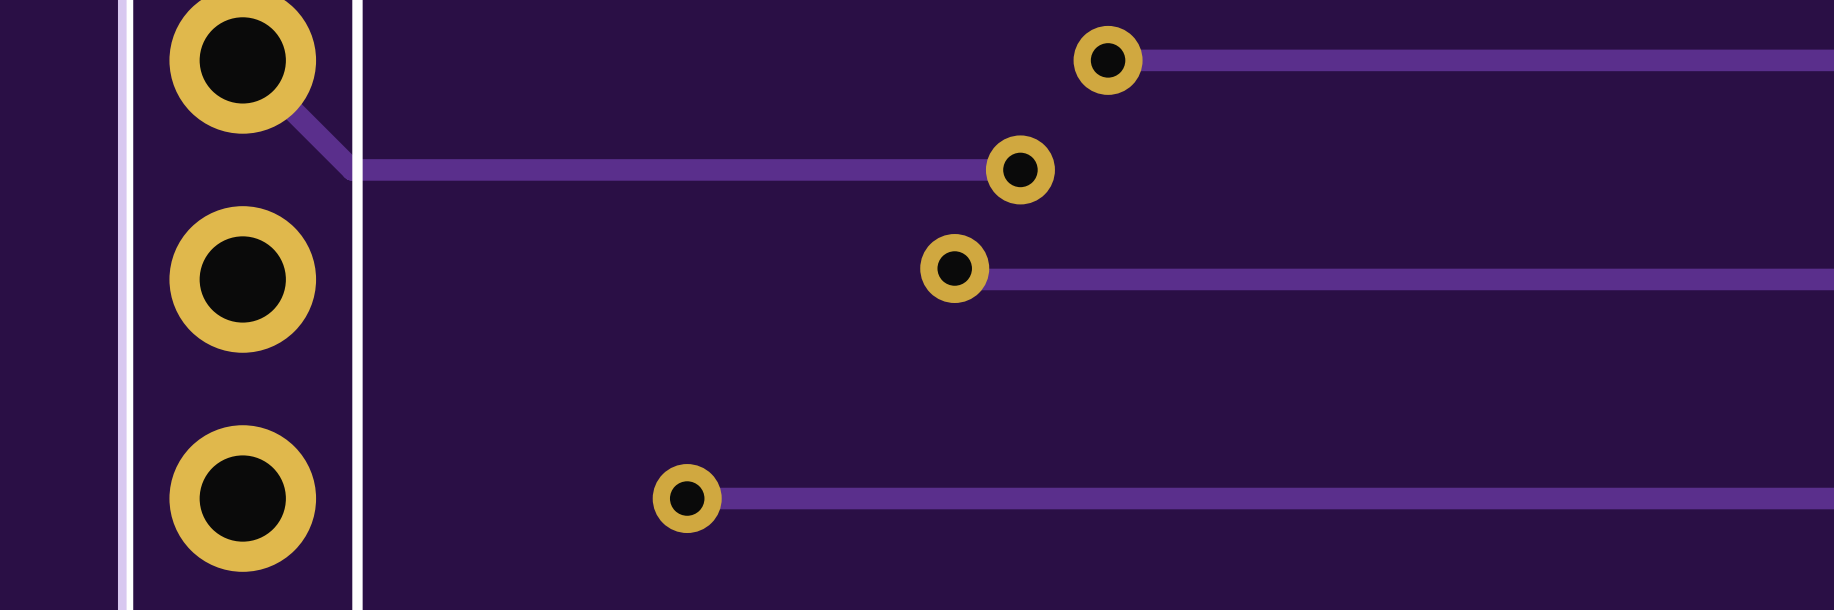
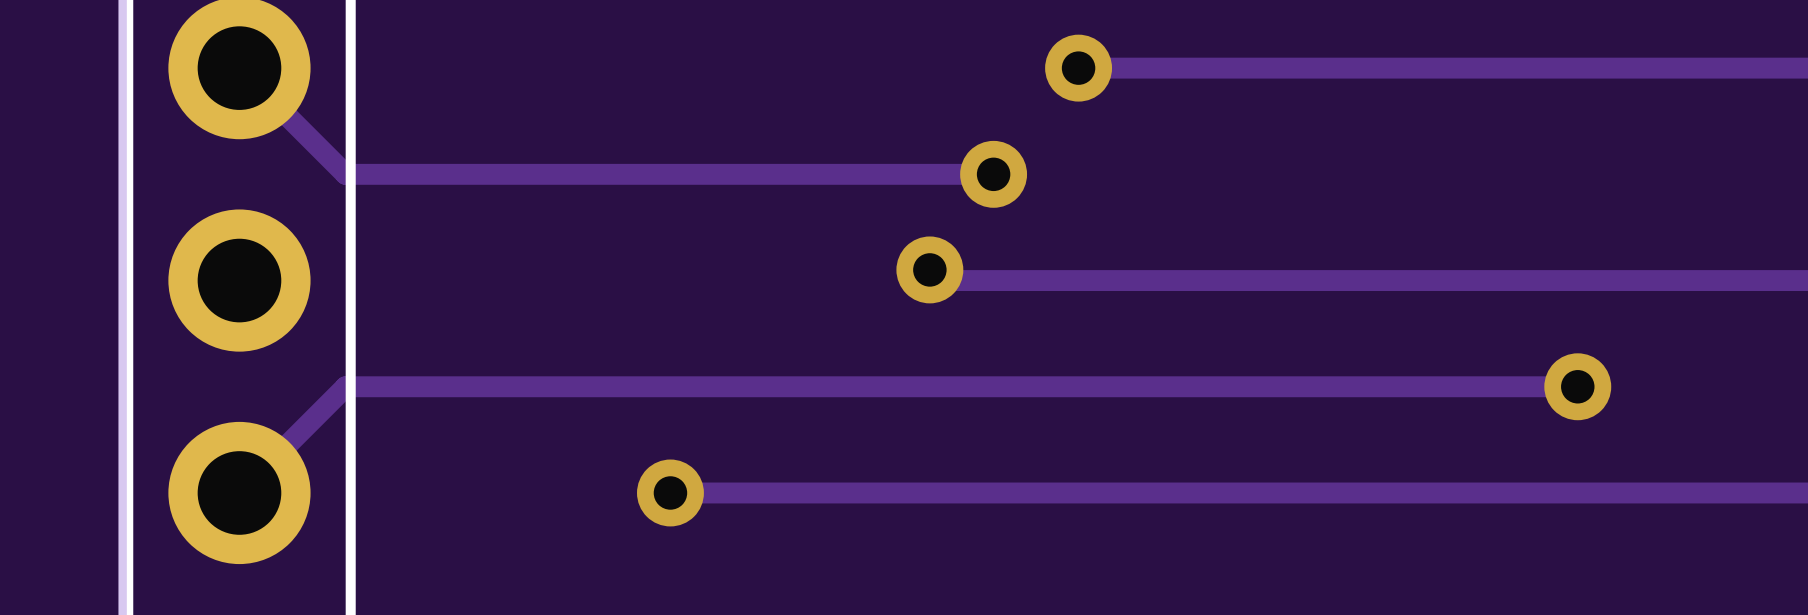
track: none -> (1577, 386) (345, 386) (239, 492)
via: none -> (1577, 386)

